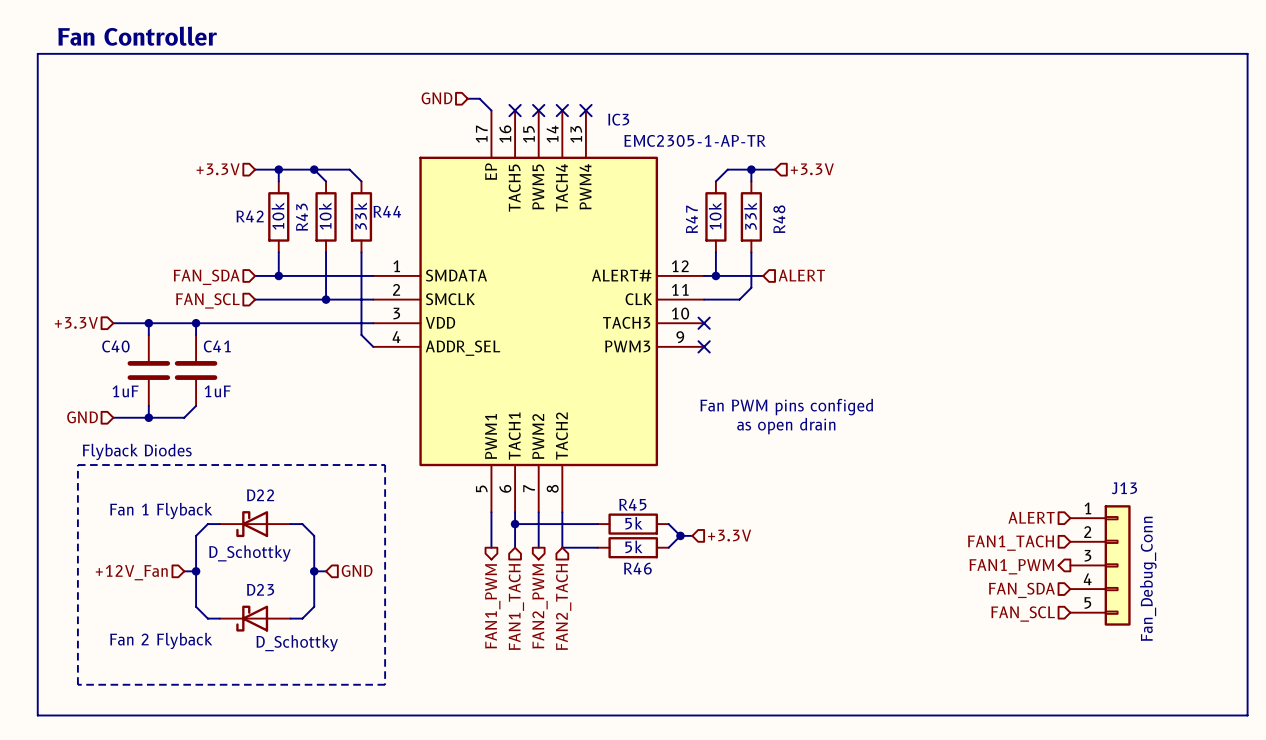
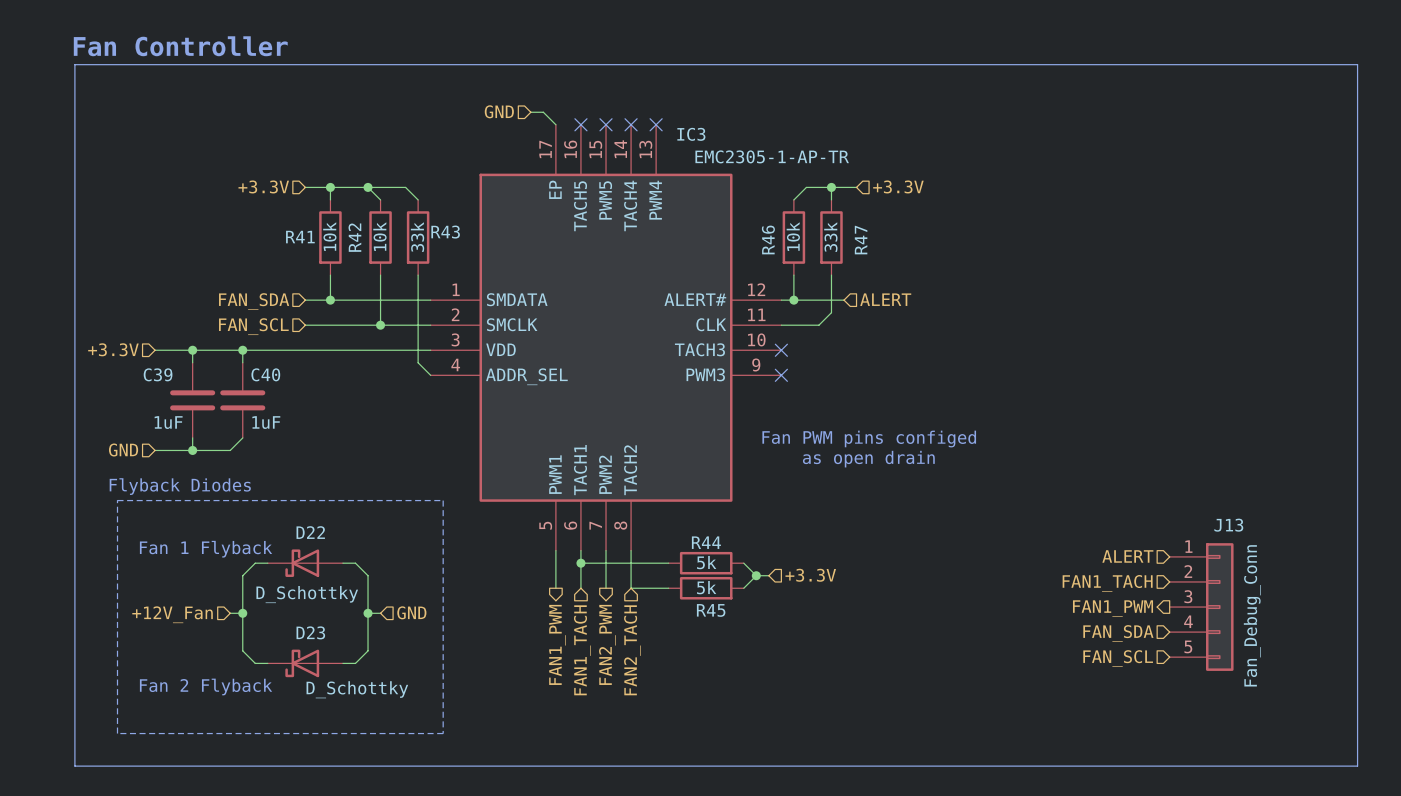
R44 name: R44 (387, 211) -> R43 (445, 232)
R42 name: R42 (250, 216) -> R41 (300, 237)
R43 name: R43 (301, 217) -> R42 (354, 237)
R47 name: R47 (691, 219) -> R46 (768, 239)
R48 name: R48 (779, 219) -> R47 (861, 240)
C40 name: C40 (115, 346) -> C39 (158, 374)
C41 name: C41 (217, 346) -> C40 (265, 374)
R45 name: R45 (632, 504) -> R44 (706, 542)
R46 name: R46 (637, 568) -> R45 (711, 610)

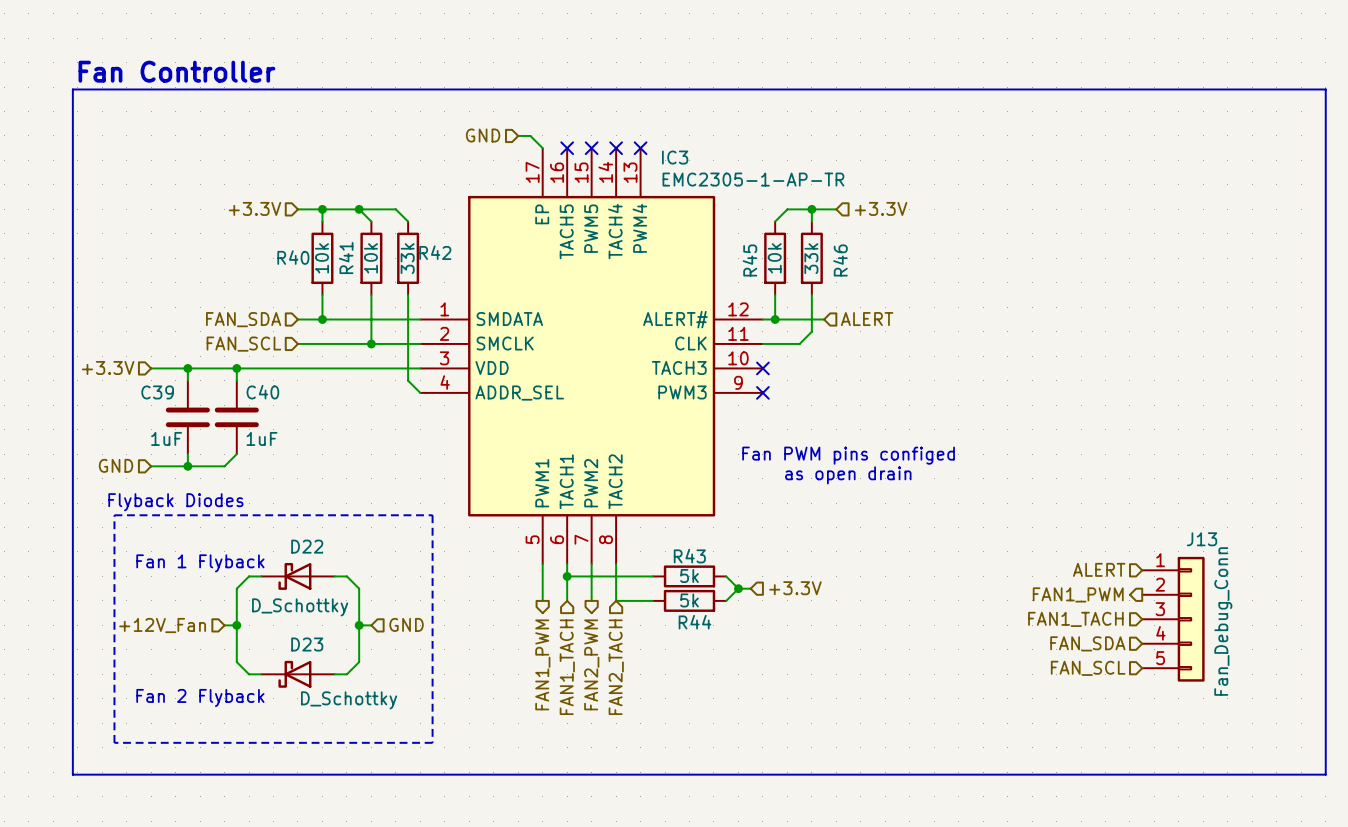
R43 name: R43 (445, 232) -> R42 (435, 252)
R41 name: R41 (300, 237) -> R40 (293, 257)
R42 name: R42 (354, 237) -> R41 (346, 258)
R46 name: R46 (768, 239) -> R45 (749, 260)
R47 name: R47 (861, 240) -> R46 (840, 260)
R44 name: R44 (706, 542) -> R43 (689, 556)
hierarchical label shape: input (1107, 583) -> output (1078, 594)
hierarchical label: FAN1_TACH (1107, 583) -> FAN1_PWM (1078, 594)
hierarchical label shape: output (1113, 608) -> input (1075, 619)
hierarchical label: FAN1_PWM (1113, 608) -> FAN1_TACH (1075, 619)
R45 name: R45 (711, 610) -> R44 (694, 622)

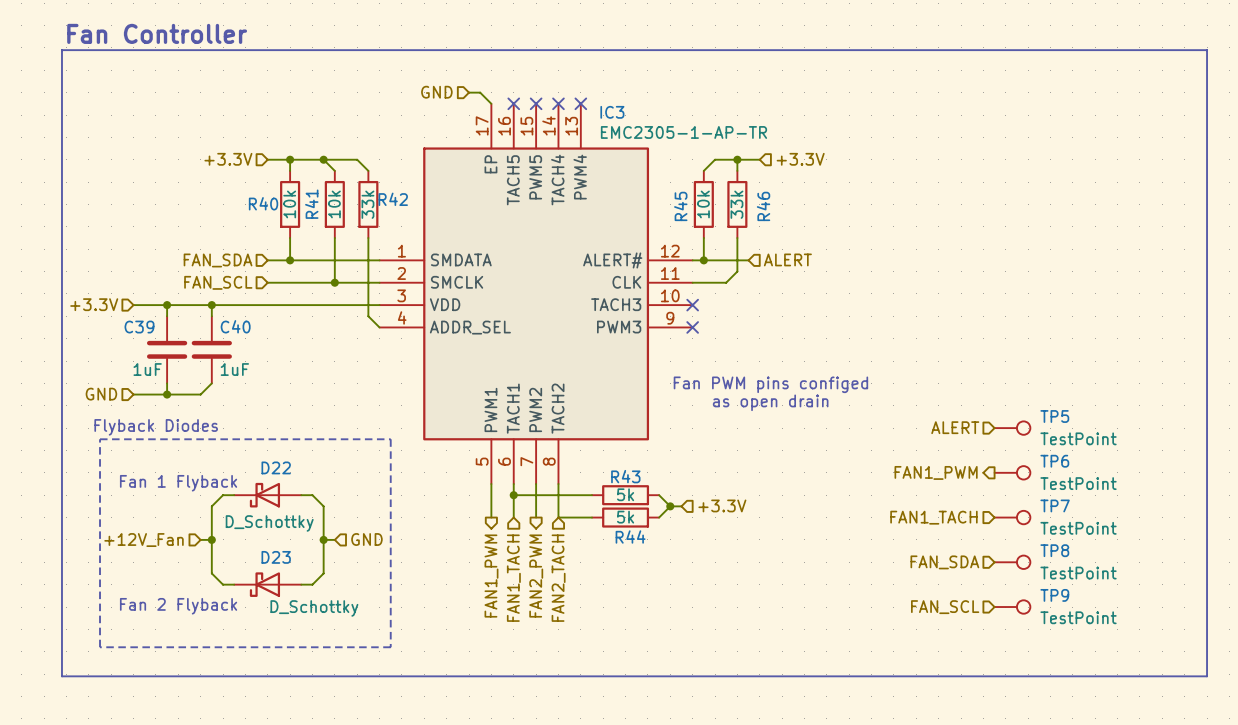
TP5: none -> TestPoint (1012, 428)
TP6: none -> TestPoint (1012, 472)
hierarchical label position: ALERT (1099, 569) -> ALERT (955, 427)
hierarchical label position: FAN1_PWM (1078, 594) -> FAN1_PWM (936, 472)
TP7: none -> TestPoint (1012, 517)
hierarchical label position: FAN1_TACH (1075, 619) -> FAN1_TACH (933, 517)
J13: Fan_Debug_Conn (1173, 619) -> none
hierarchical label position: FAN_SDA (1087, 643) -> FAN_SDA (944, 562)
TP8: none -> TestPoint (1012, 562)
hierarchical label position: FAN_SCL (1088, 668) -> FAN_SCL (945, 607)
TP9: none -> TestPoint (1012, 607)

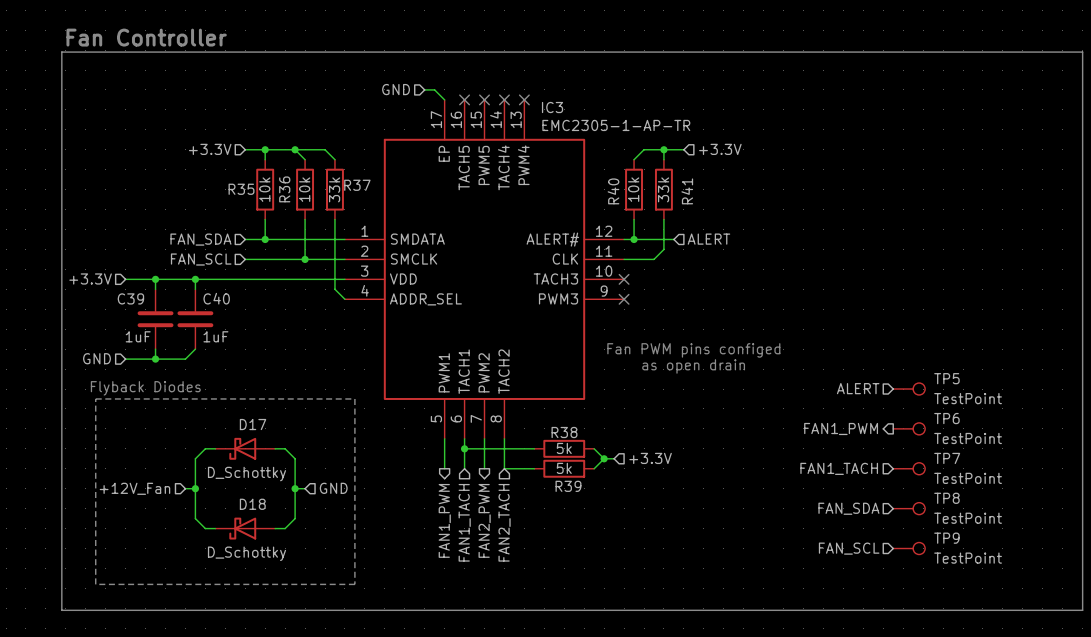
R42 name: R42 (393, 199) -> R37 (357, 185)
R40 name: R40 (263, 203) -> R35 (241, 189)
R41 name: R41 (311, 204) -> R36 (284, 189)
R45 name: R45 (680, 206) -> R40 (613, 191)
R46 name: R46 (763, 206) -> R41 (687, 191)
D22 name: D22 (276, 467) -> D17 (253, 424)
R43 name: R43 (625, 476) -> R38 (564, 432)
text: Fan 1 Flyback (178, 483) -> none
R44 name: R44 (630, 537) -> R39 (568, 486)
D23 name: D23 (276, 557) -> D18 (252, 504)
text: Fan 2 Flyback (178, 606) -> none
D23 value position: D_Schottky (314, 608) -> D_Schottky (246, 553)

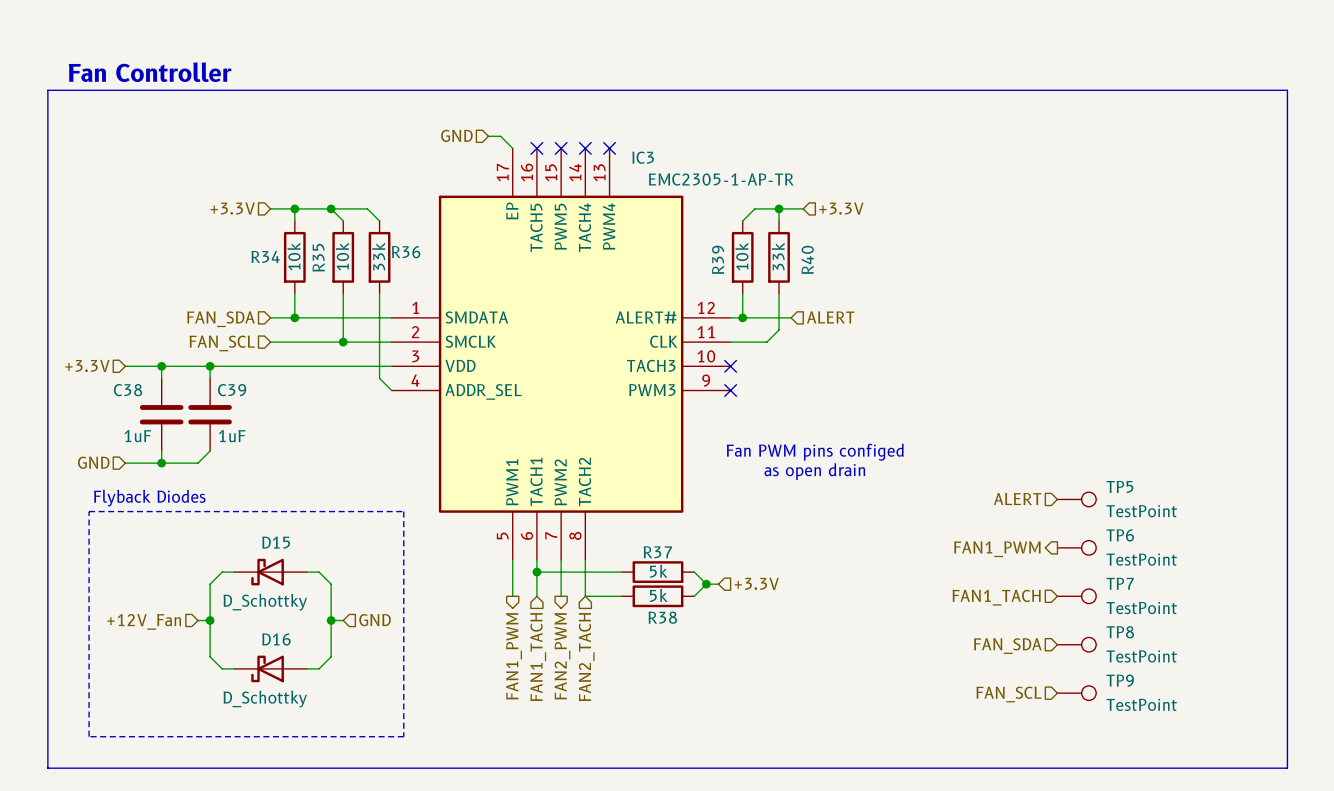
R37 name: R37 (357, 185) -> R36 (406, 252)
R35 name: R35 (241, 189) -> R34 (265, 256)
R36 name: R36 (284, 189) -> R35 (318, 257)
R40 name: R40 (613, 191) -> R39 (718, 259)
R41 name: R41 (687, 191) -> R40 (807, 259)
C39 name: C39 (130, 298) -> C38 (128, 390)
C40 name: C40 (216, 298) -> C39 (232, 390)
D17 name: D17 (253, 424) -> D15 (276, 542)
R38 name: R38 (564, 432) -> R37 (657, 552)
R39 name: R39 (568, 486) -> R38 (662, 617)
D18 name: D18 (252, 504) -> D16 (276, 639)

